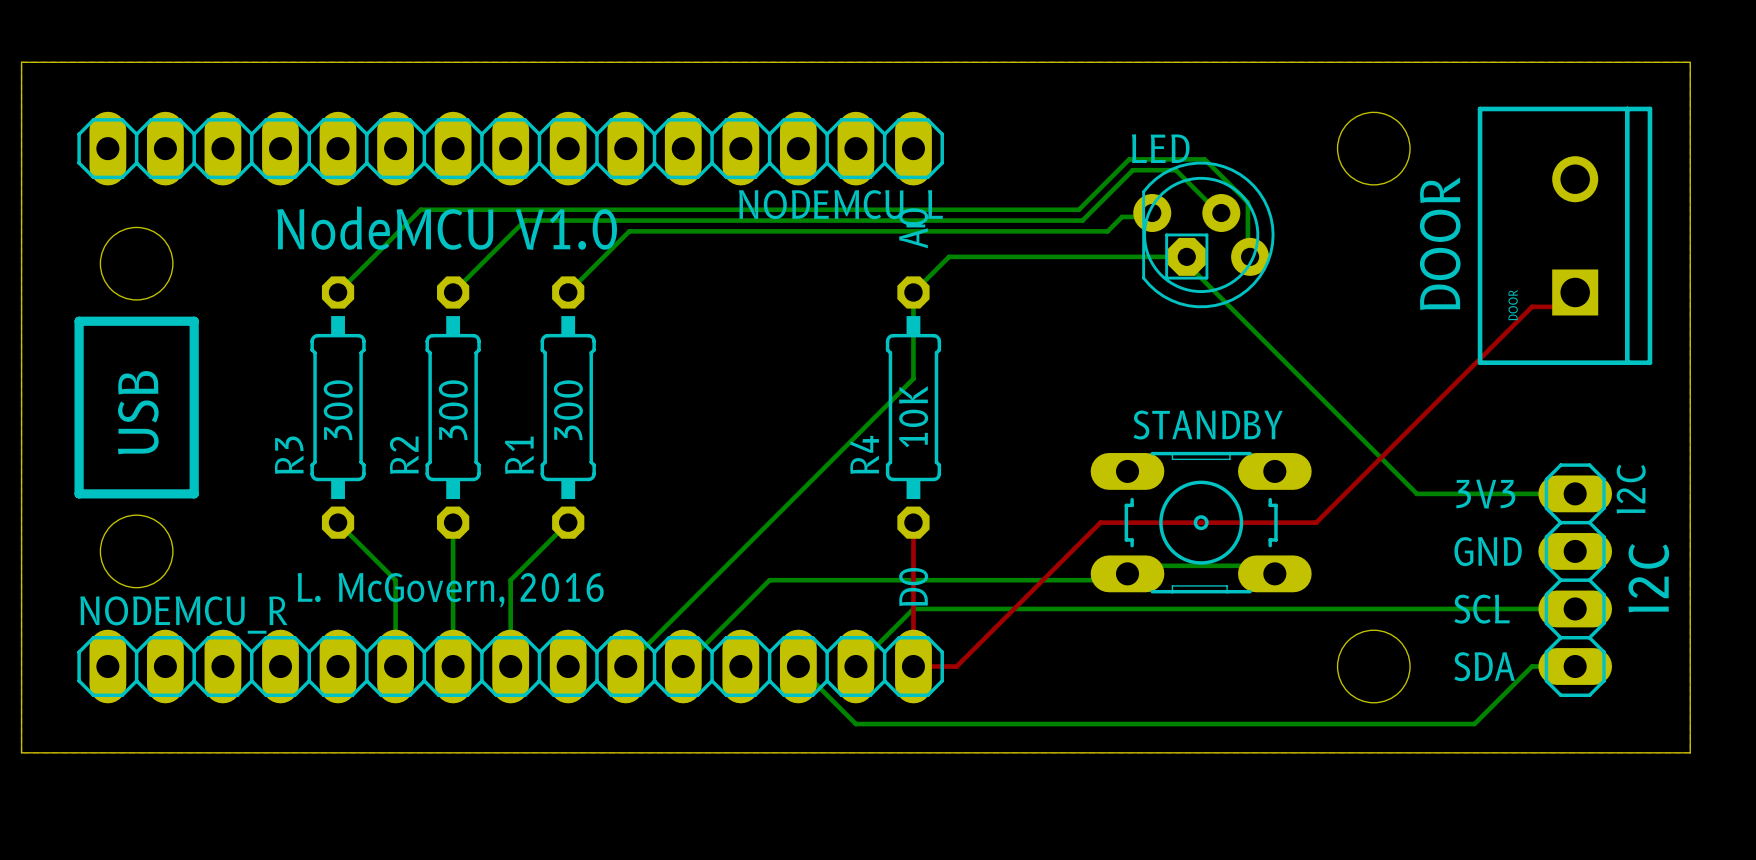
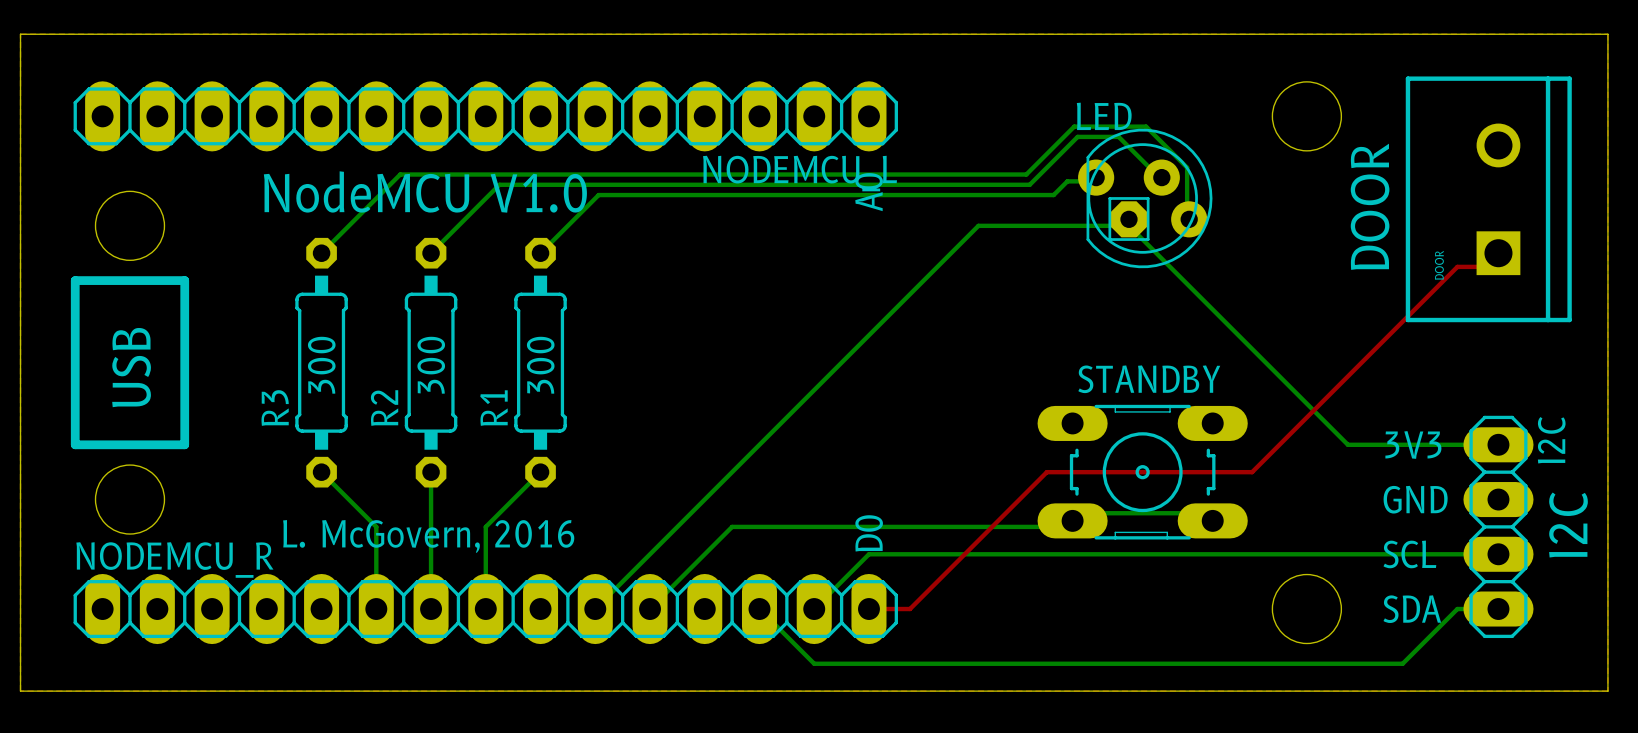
bottom track: (1186, 256) (949, 256) (913, 292) (913, 378) -> (1128, 225) (978, 225) (868, 335)
R4: (913, 407) -> none
text: 10K (913, 416) -> none
top track: (913, 522) (913, 666) -> none

